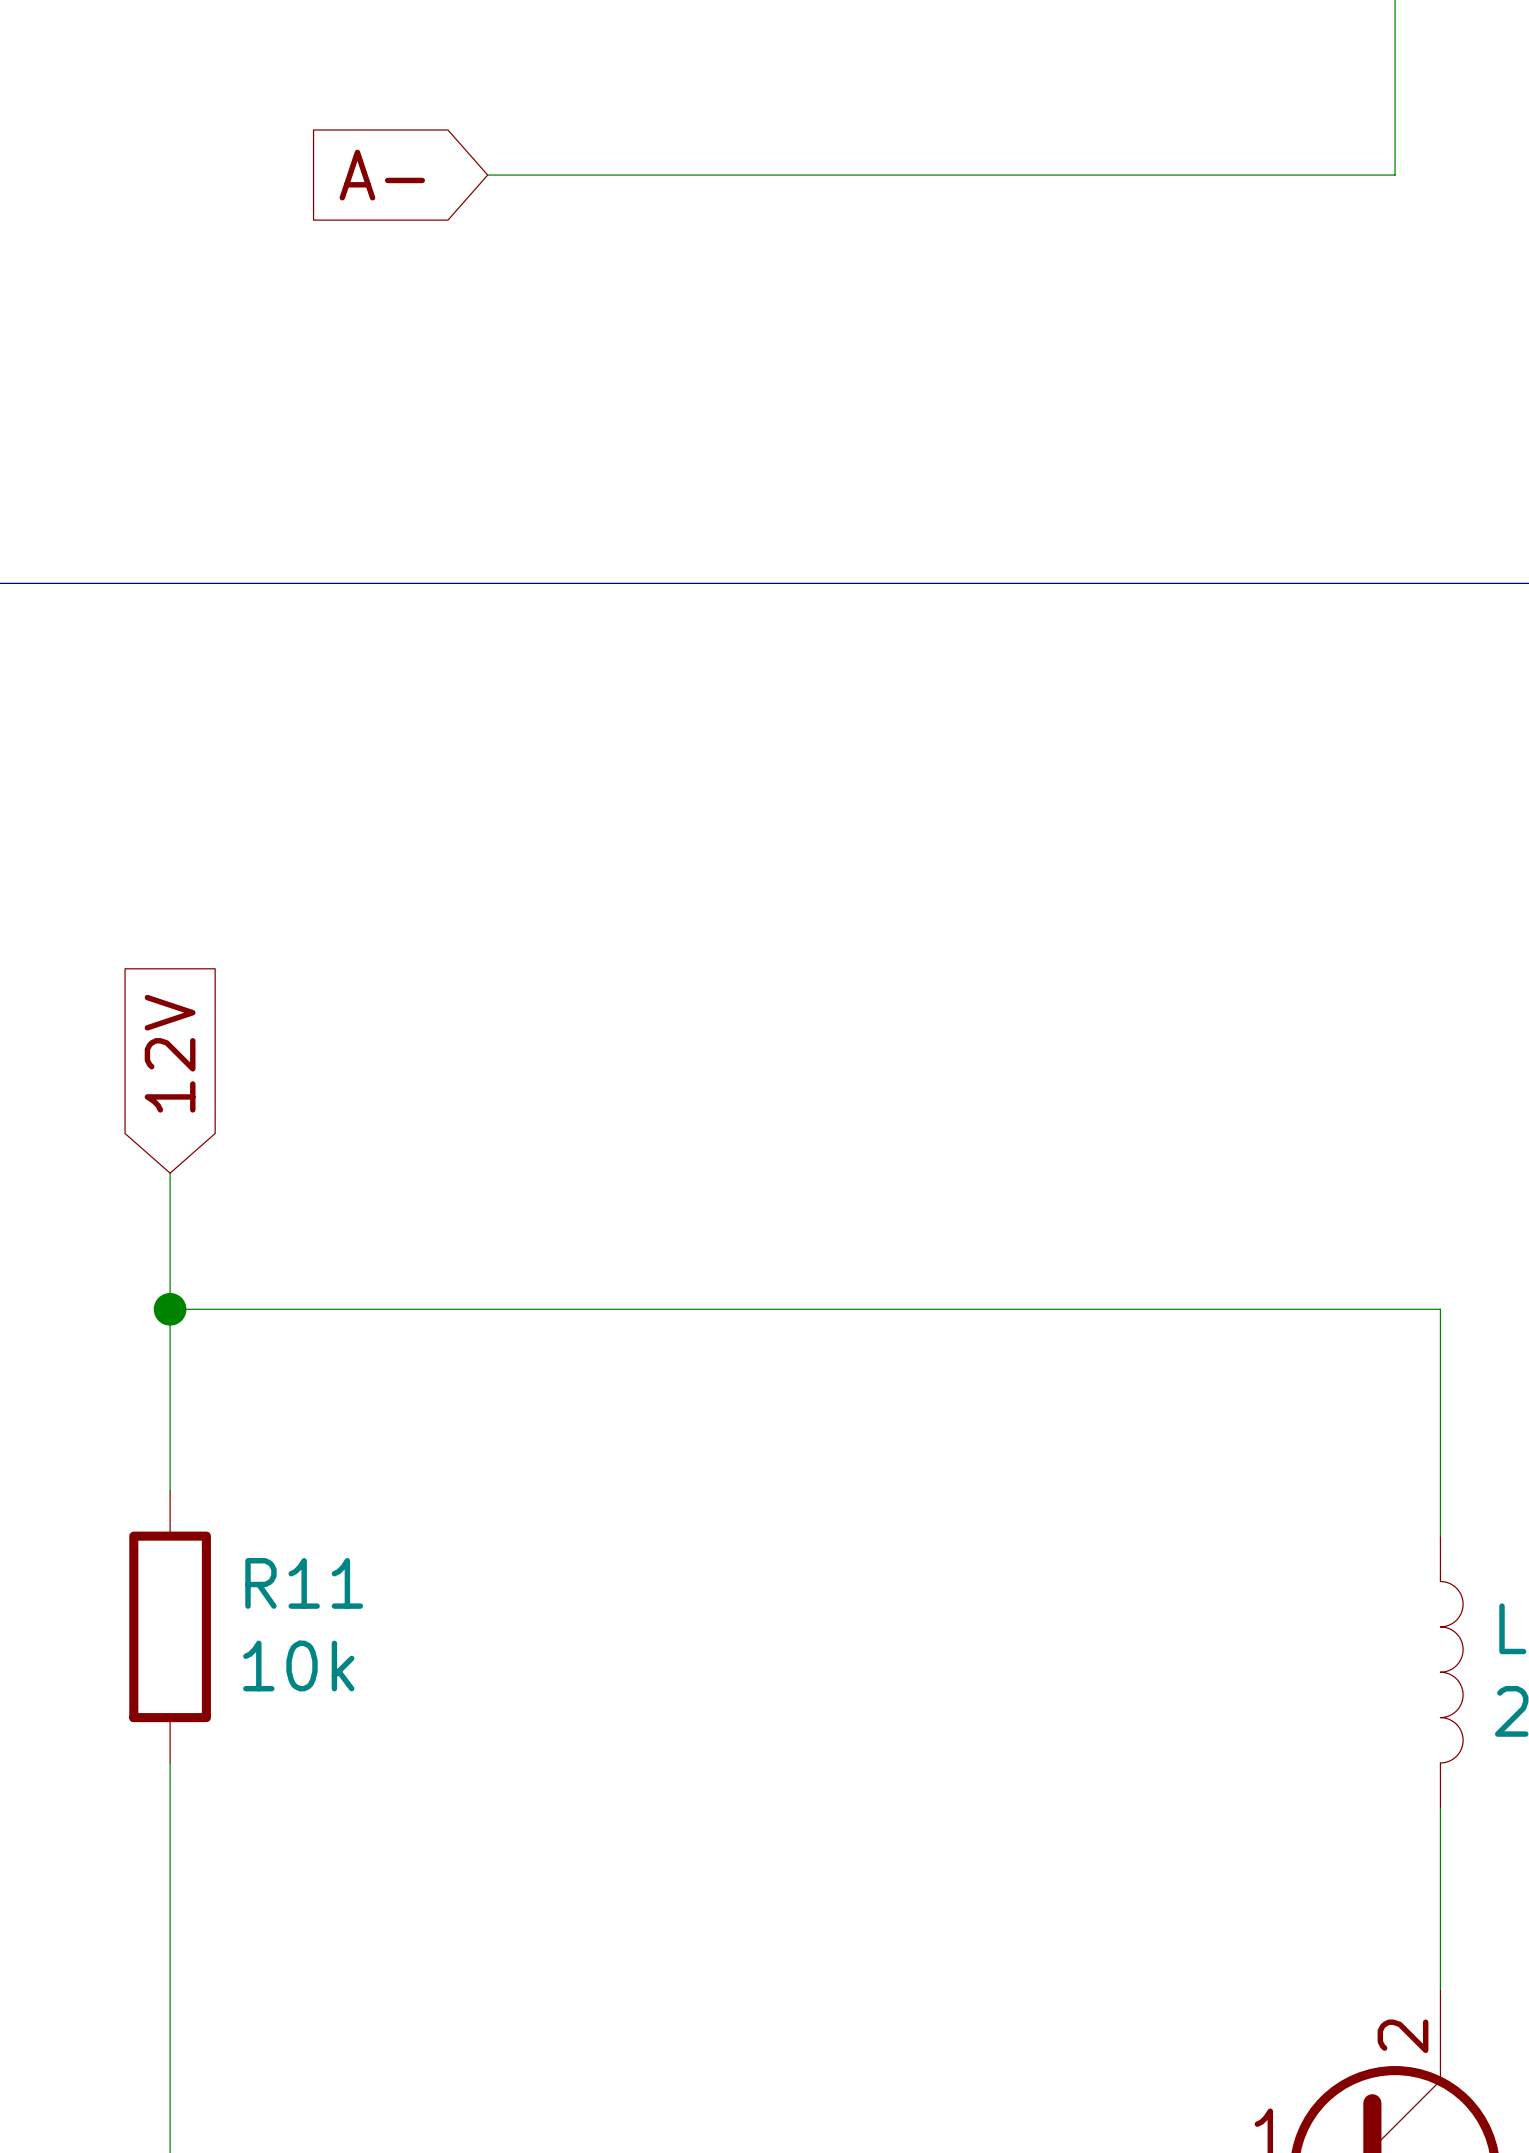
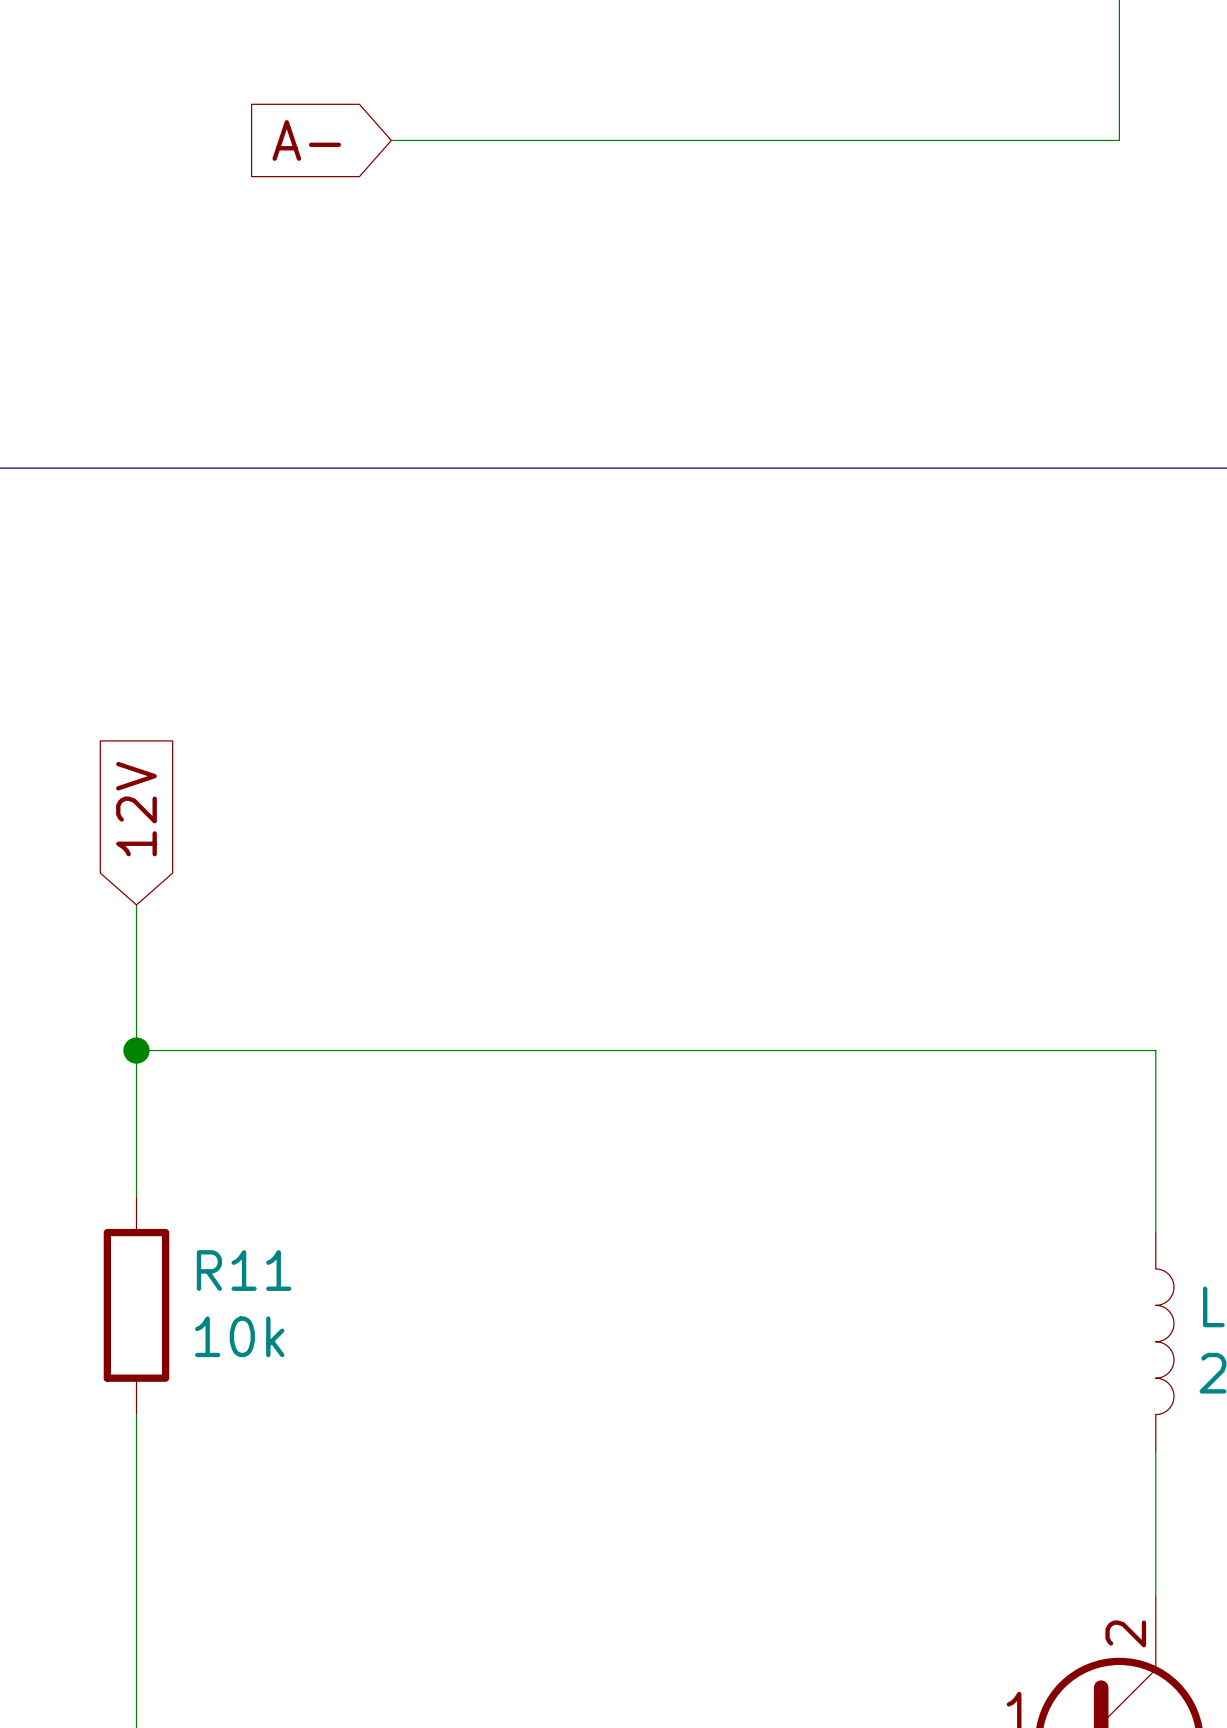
global label position: 12V (170, 1053) -> 12V (136, 809)
wire: none -> (136, 904) (136, 941)

